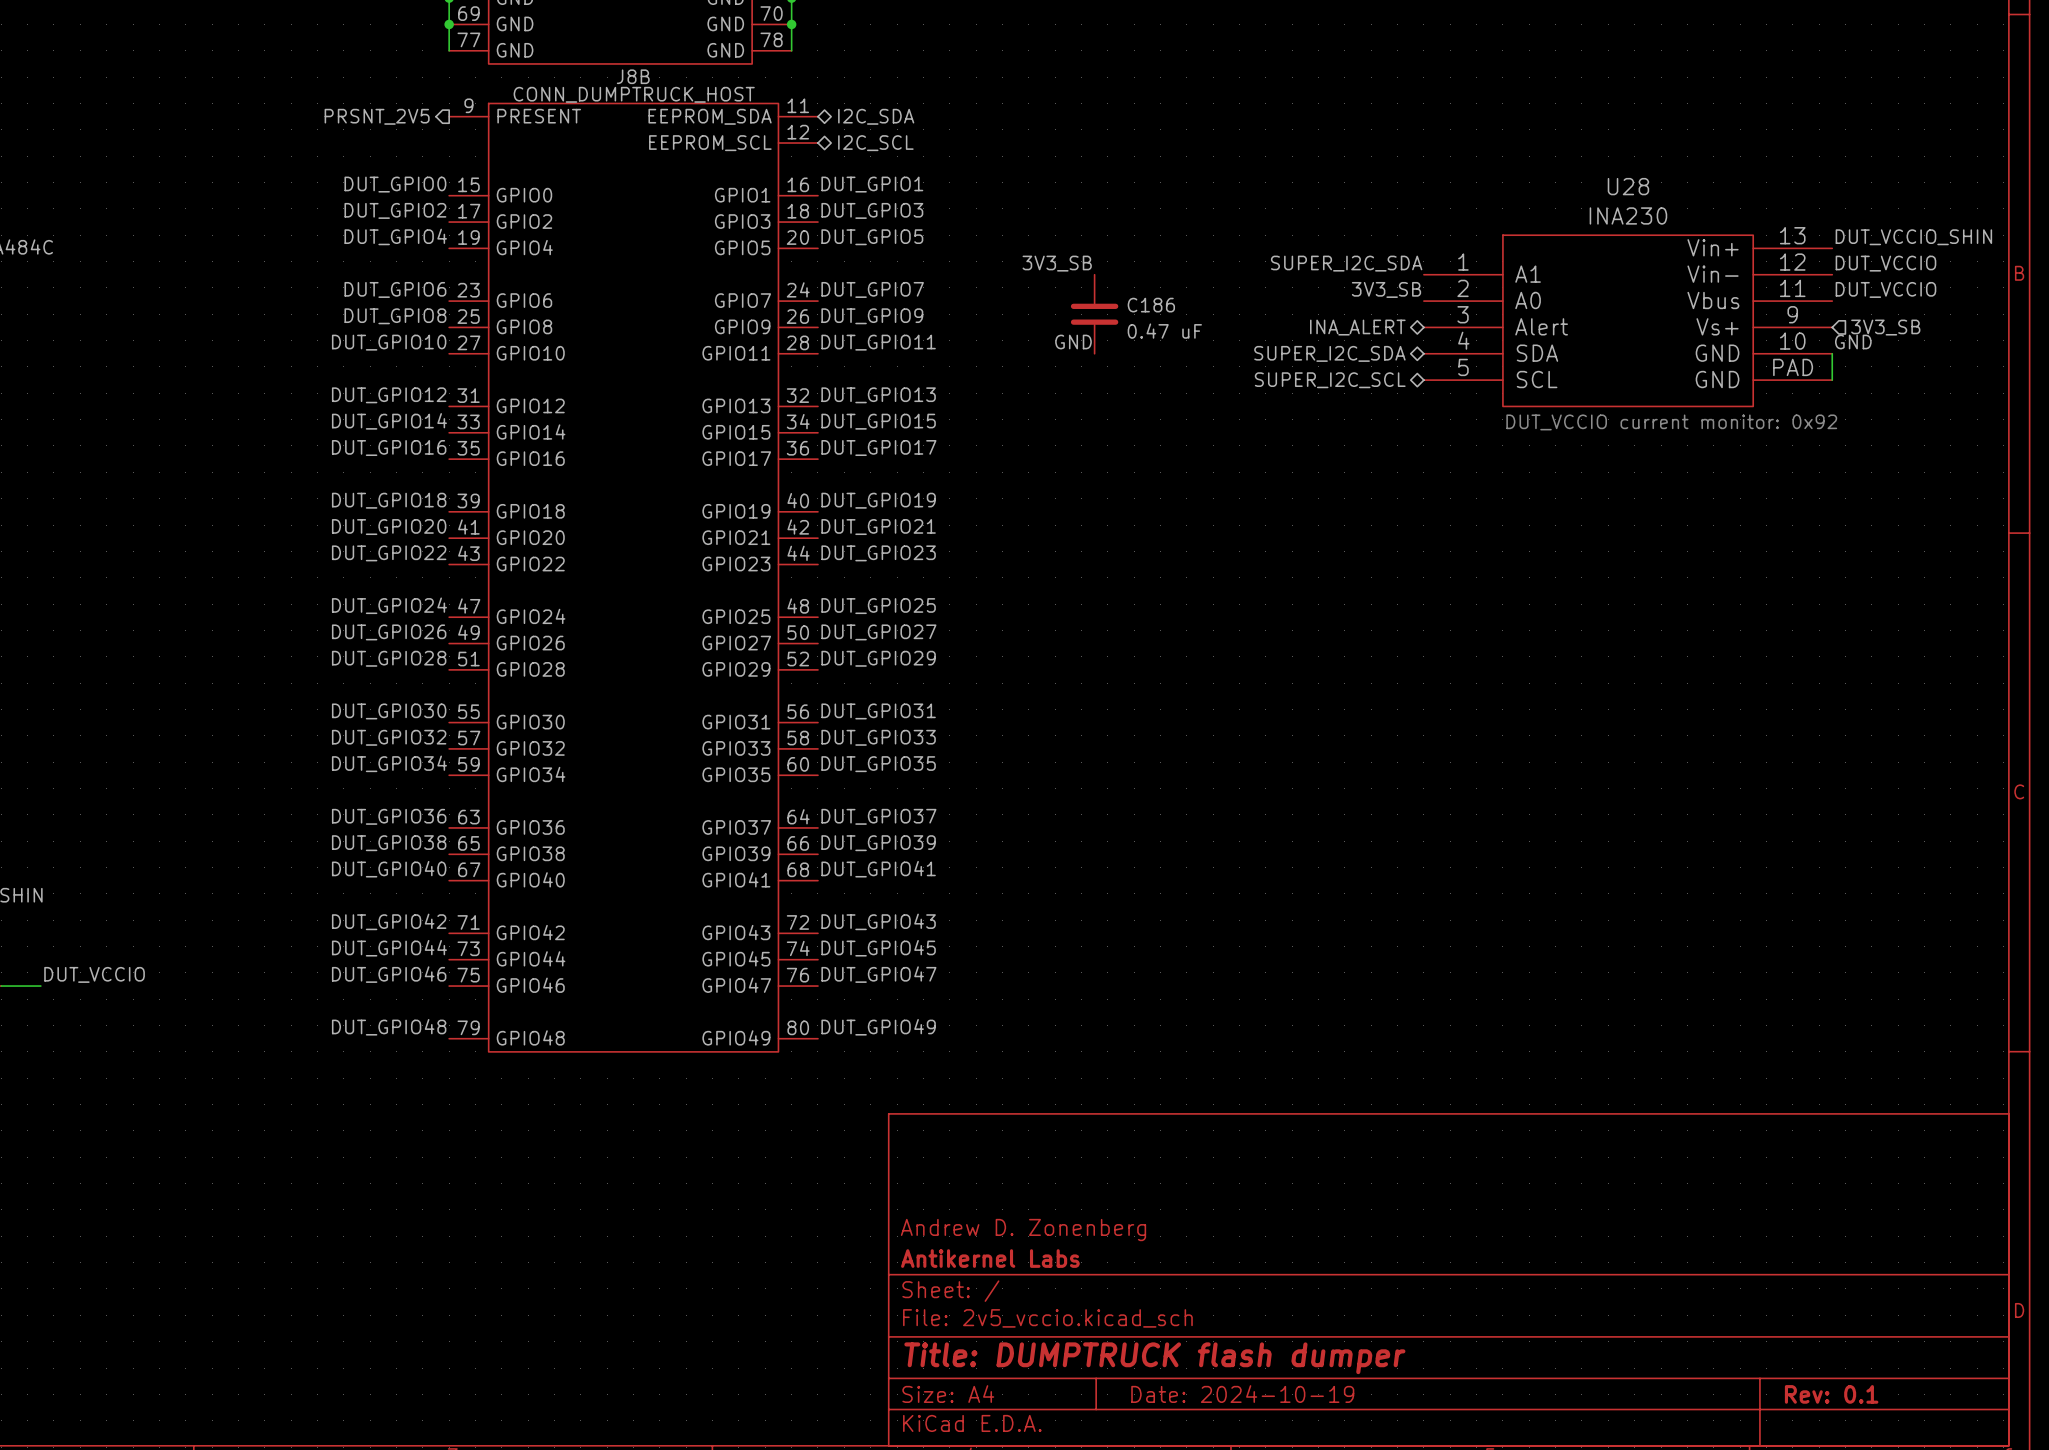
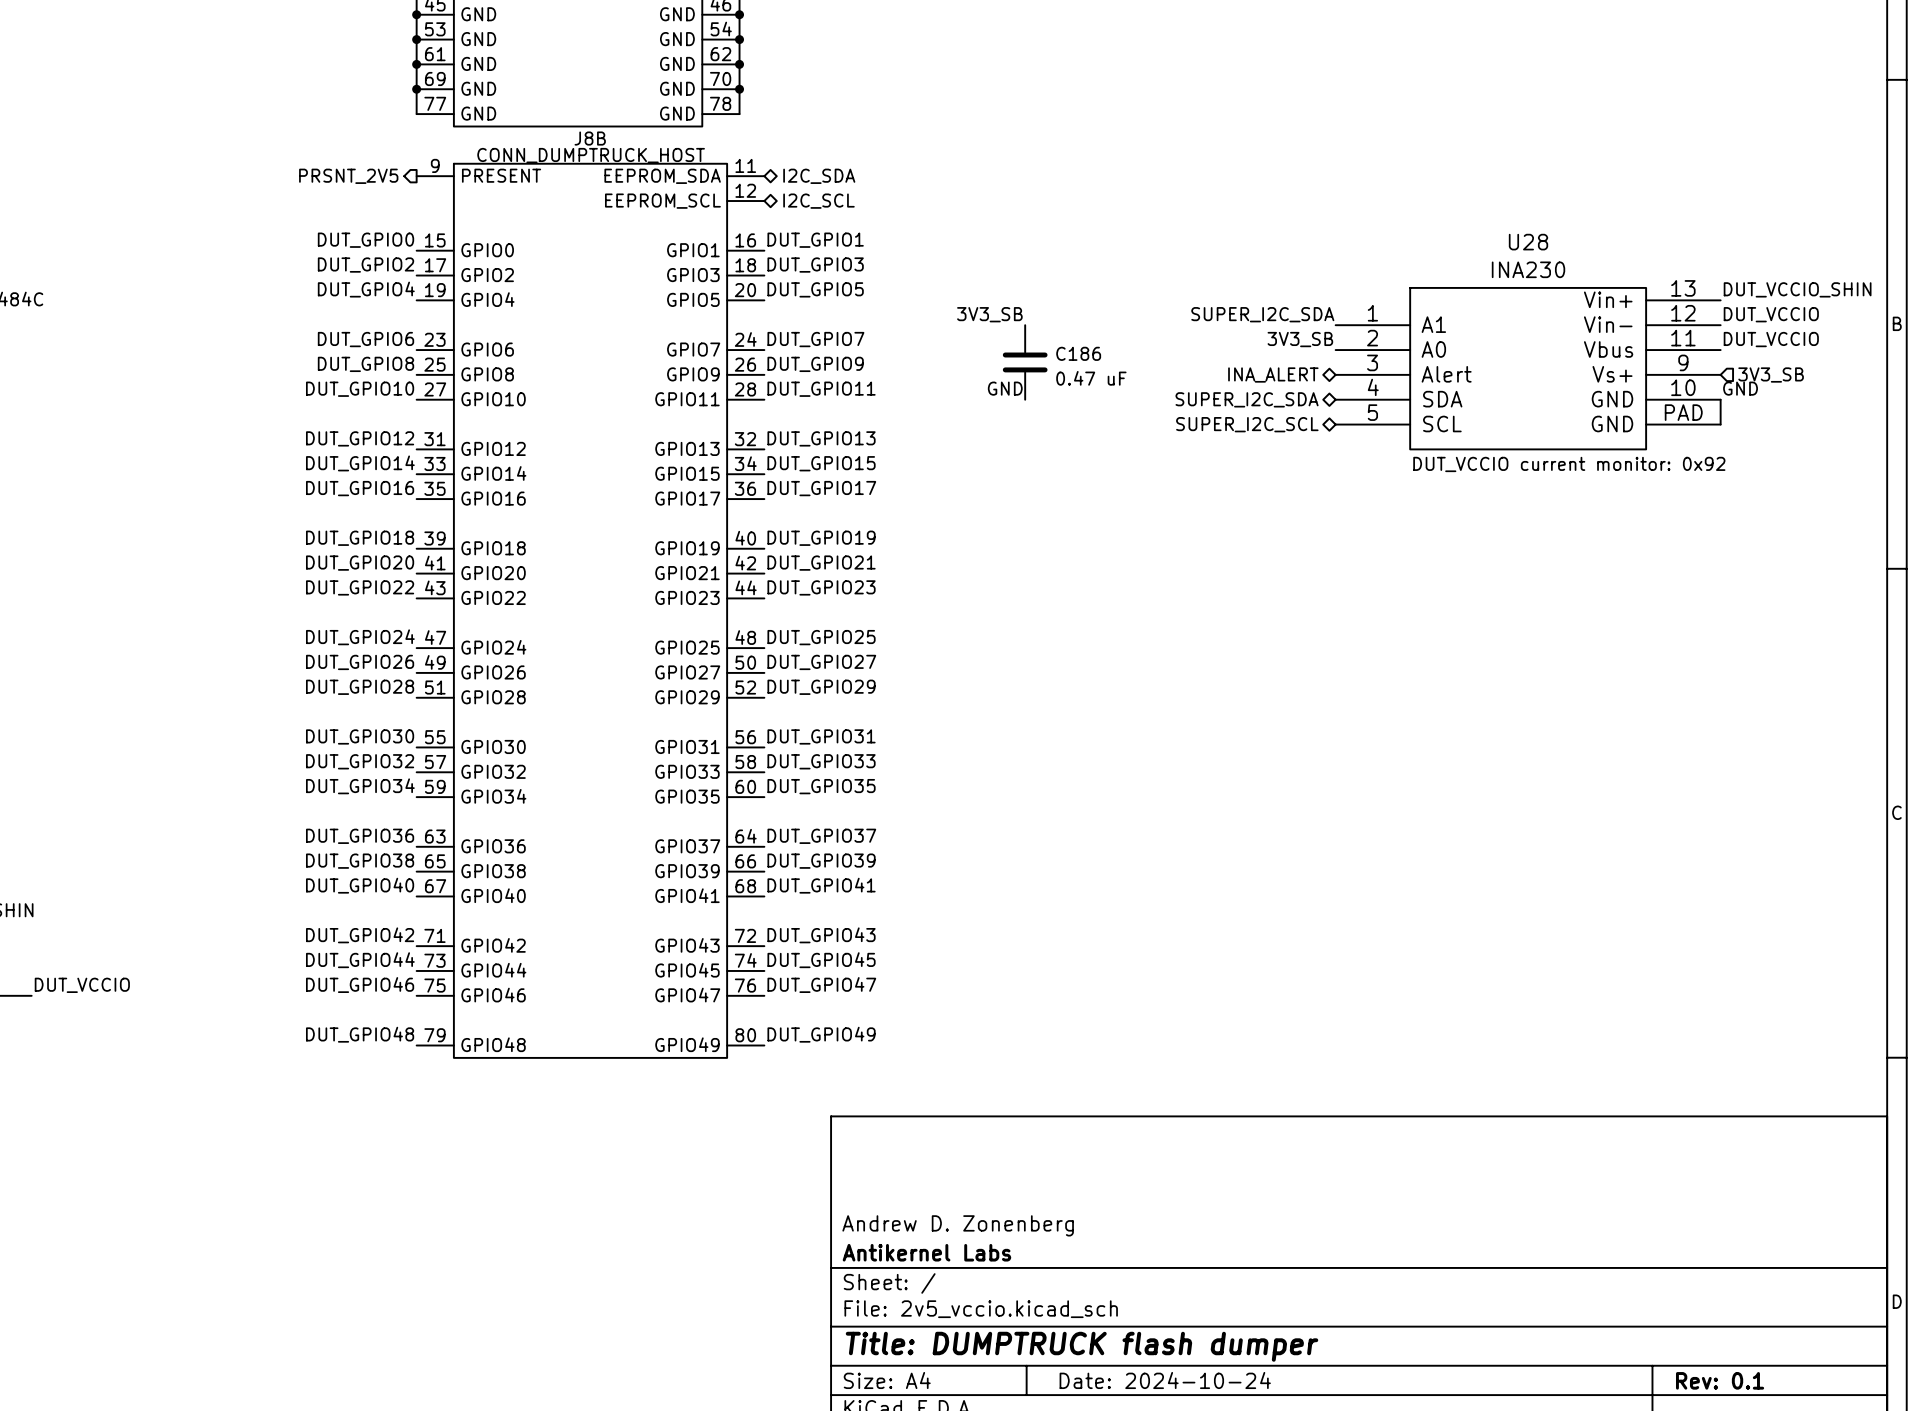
title block: Date: 2024-10-19 (1242, 1394) -> Date: 2024-10-24 (1165, 1380)

